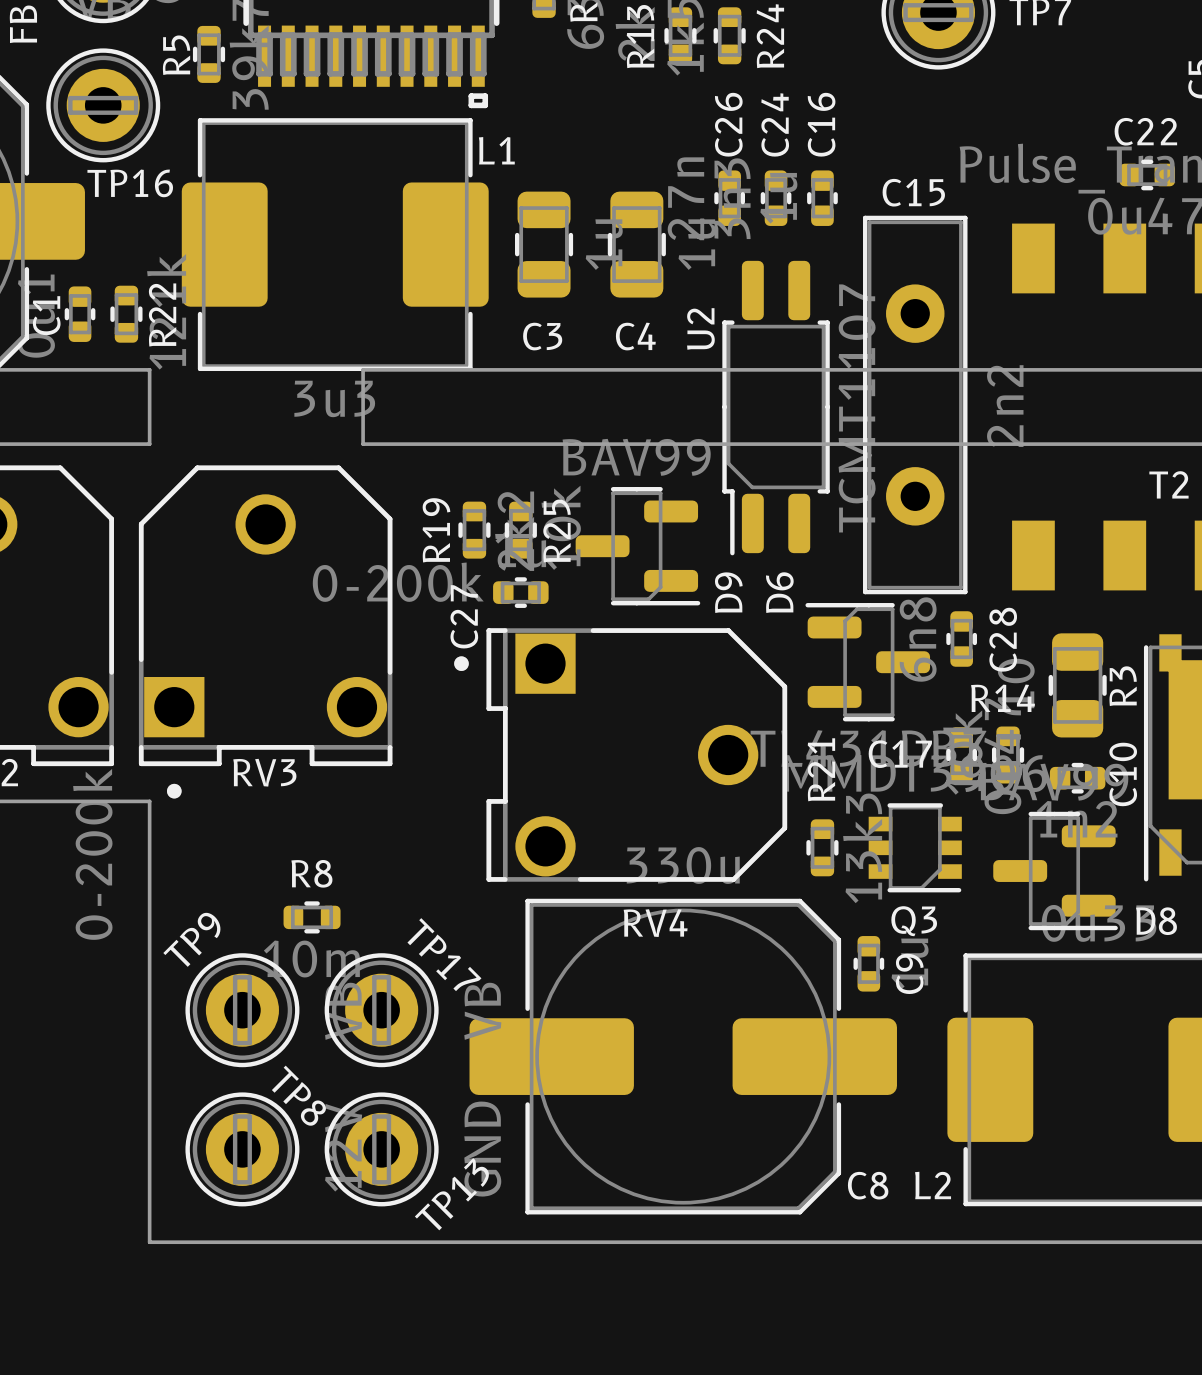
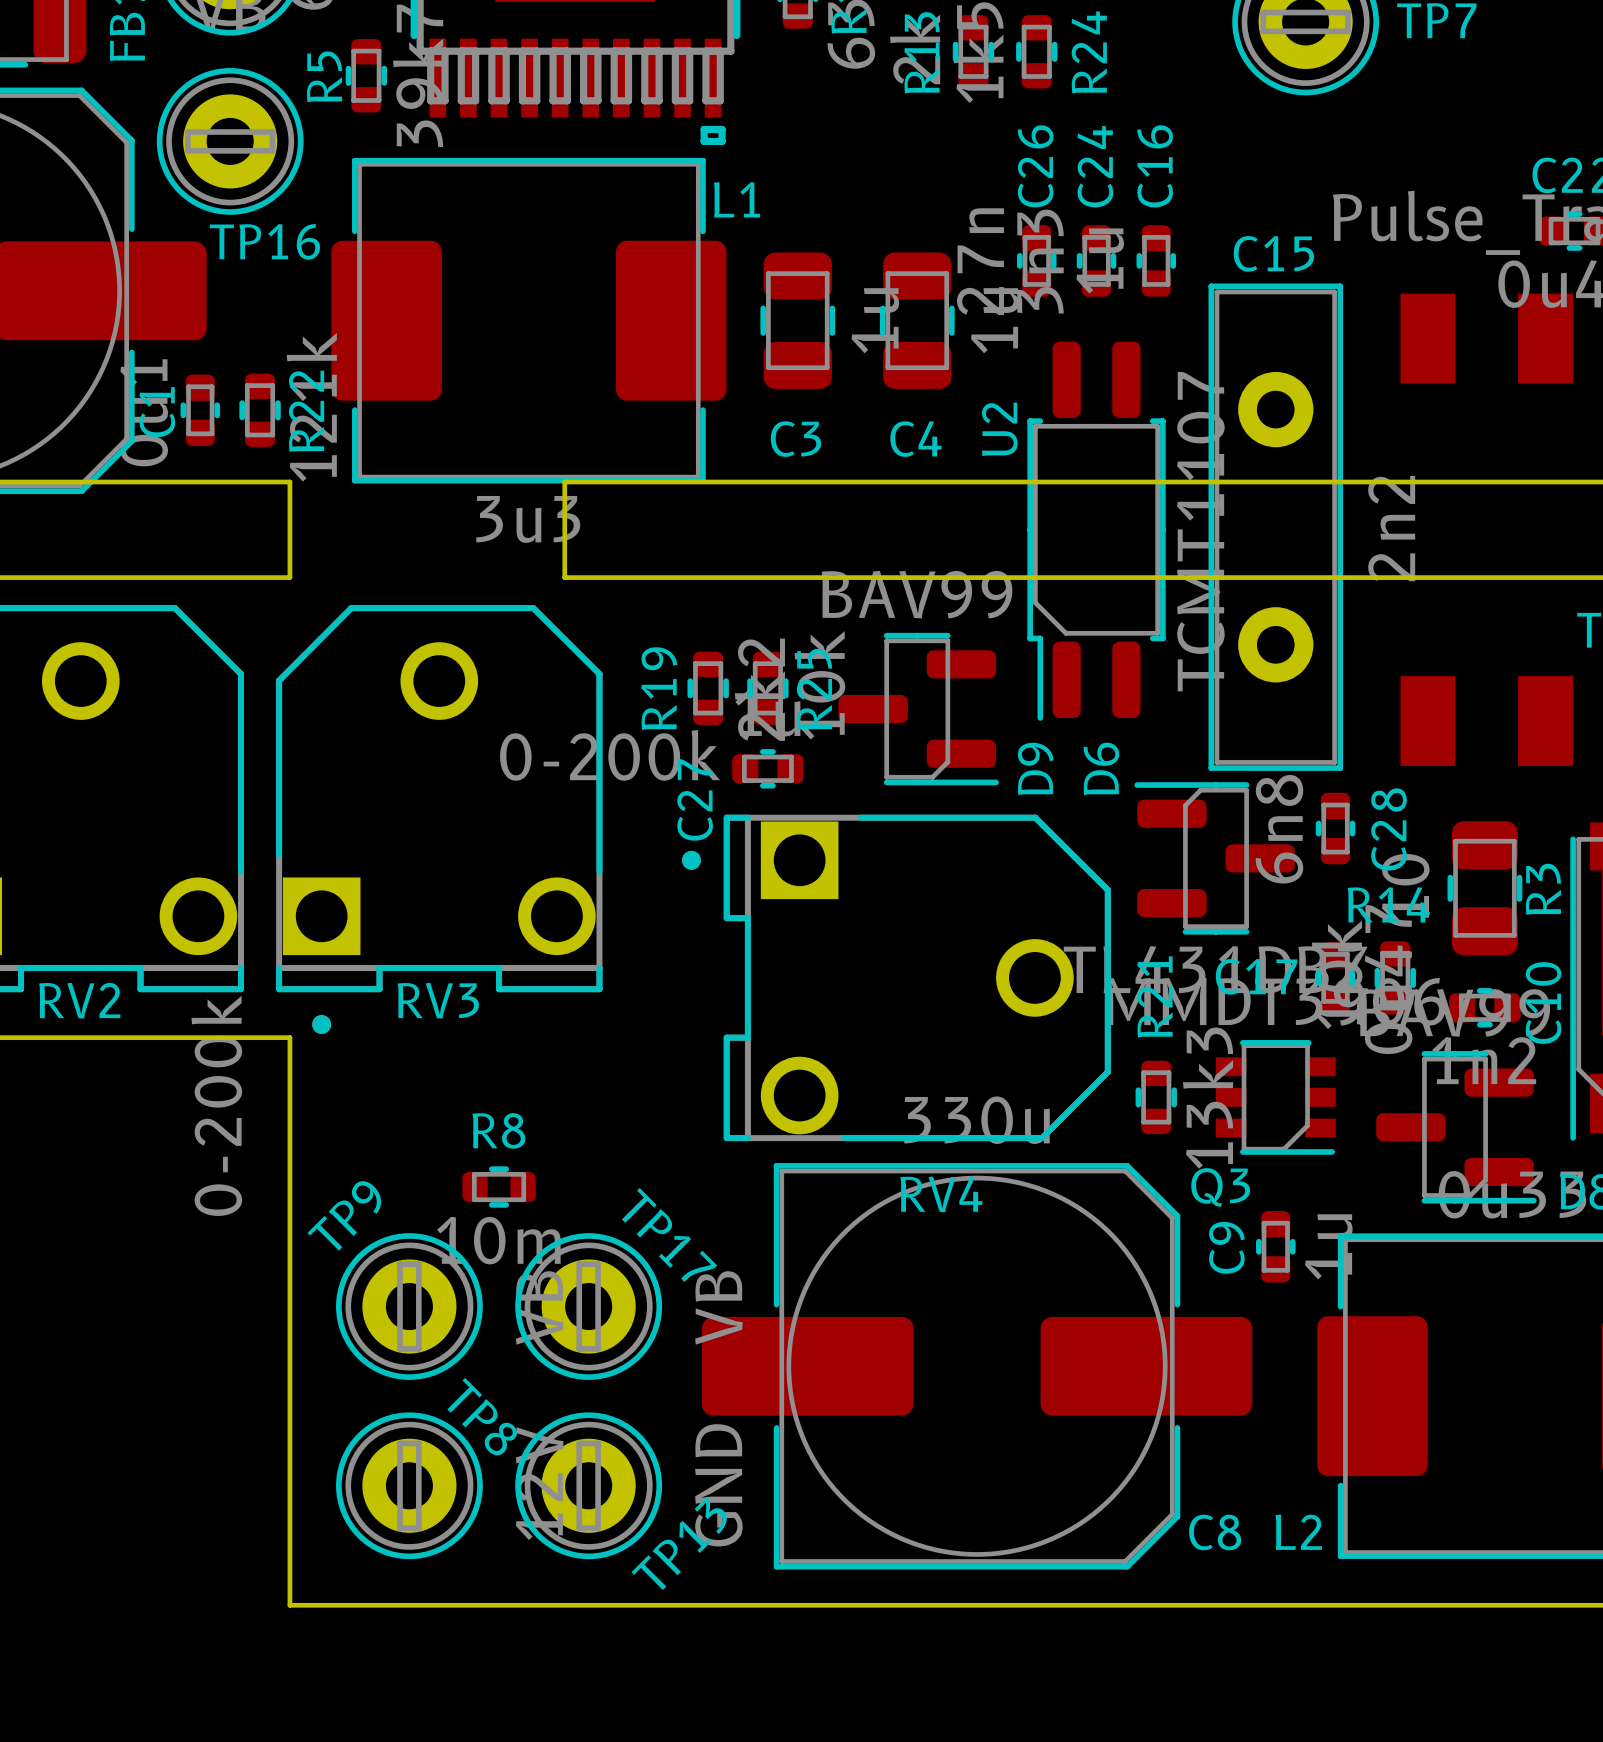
Q3 name position: Q3 (914, 921) -> Q3 (1220, 1187)
C9 position: (868, 963) -> (1275, 1246)
C9 name position: C9 (909, 973) -> C9 (1226, 1247)

